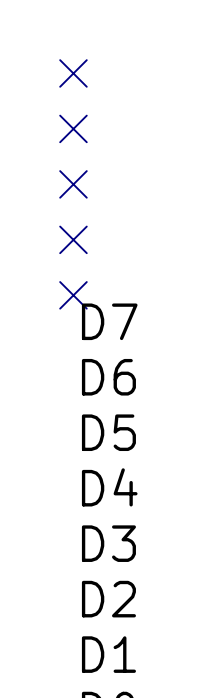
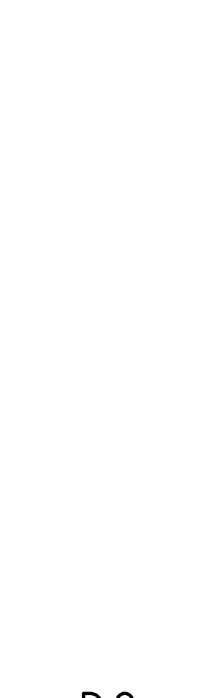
no-connect mark: (73, 73) -> none
no-connect mark: (73, 128) -> none
no-connect mark: (73, 184) -> none
no-connect mark: (73, 239) -> none
no-connect mark: (73, 295) -> none
label: D7 (109, 321) -> none
label: D6 (108, 377) -> none
label: D5 (108, 432) -> none
label: D4 (109, 487) -> none
label: D3 (108, 543) -> none
label: D2 (108, 599) -> none
label: D1 (108, 654) -> none

